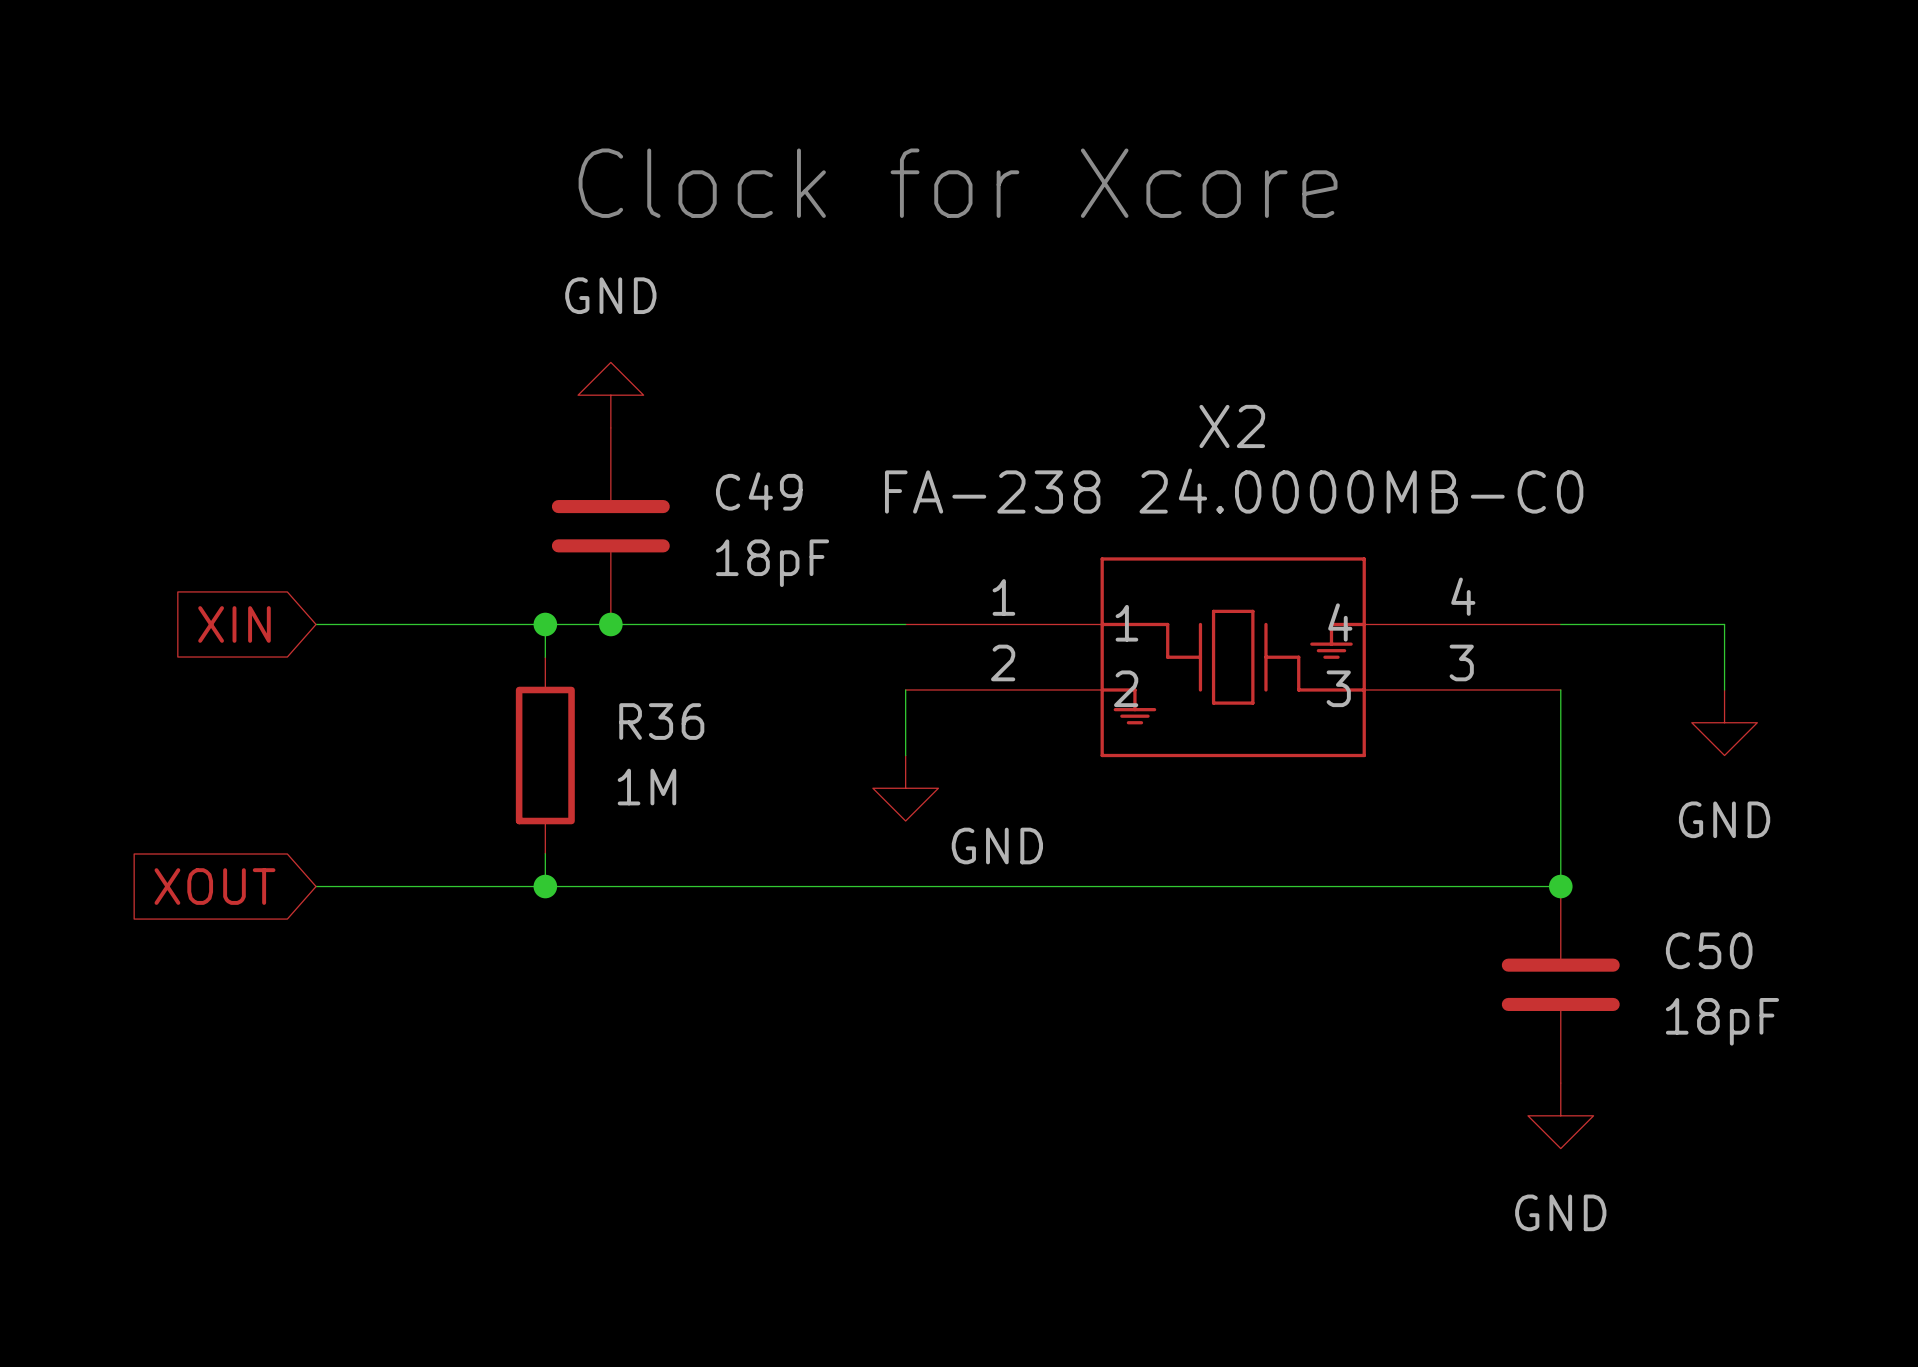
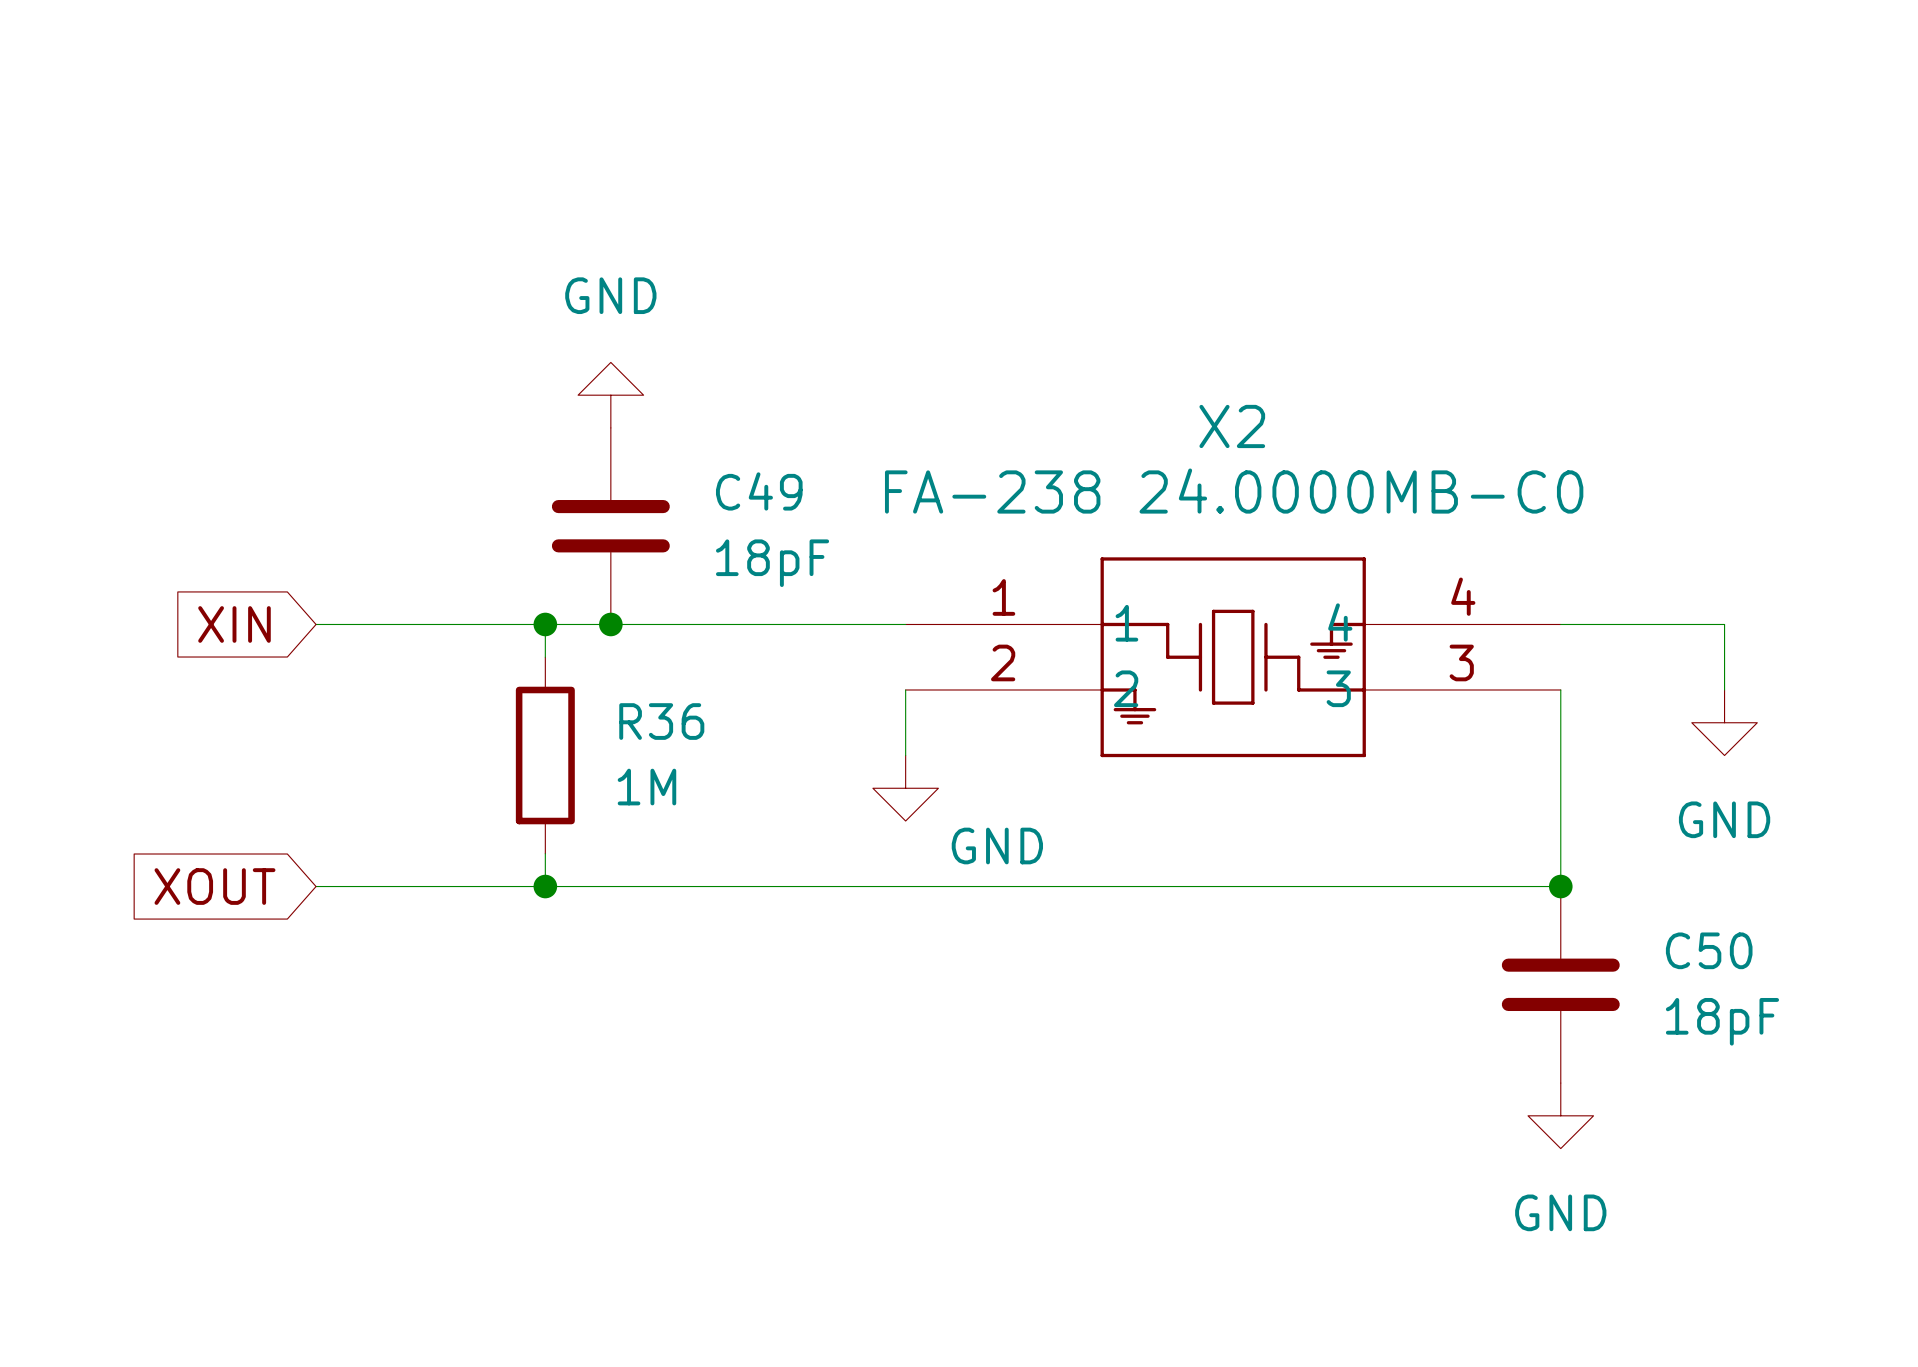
text: Clock for Xcore (958, 183) -> none

